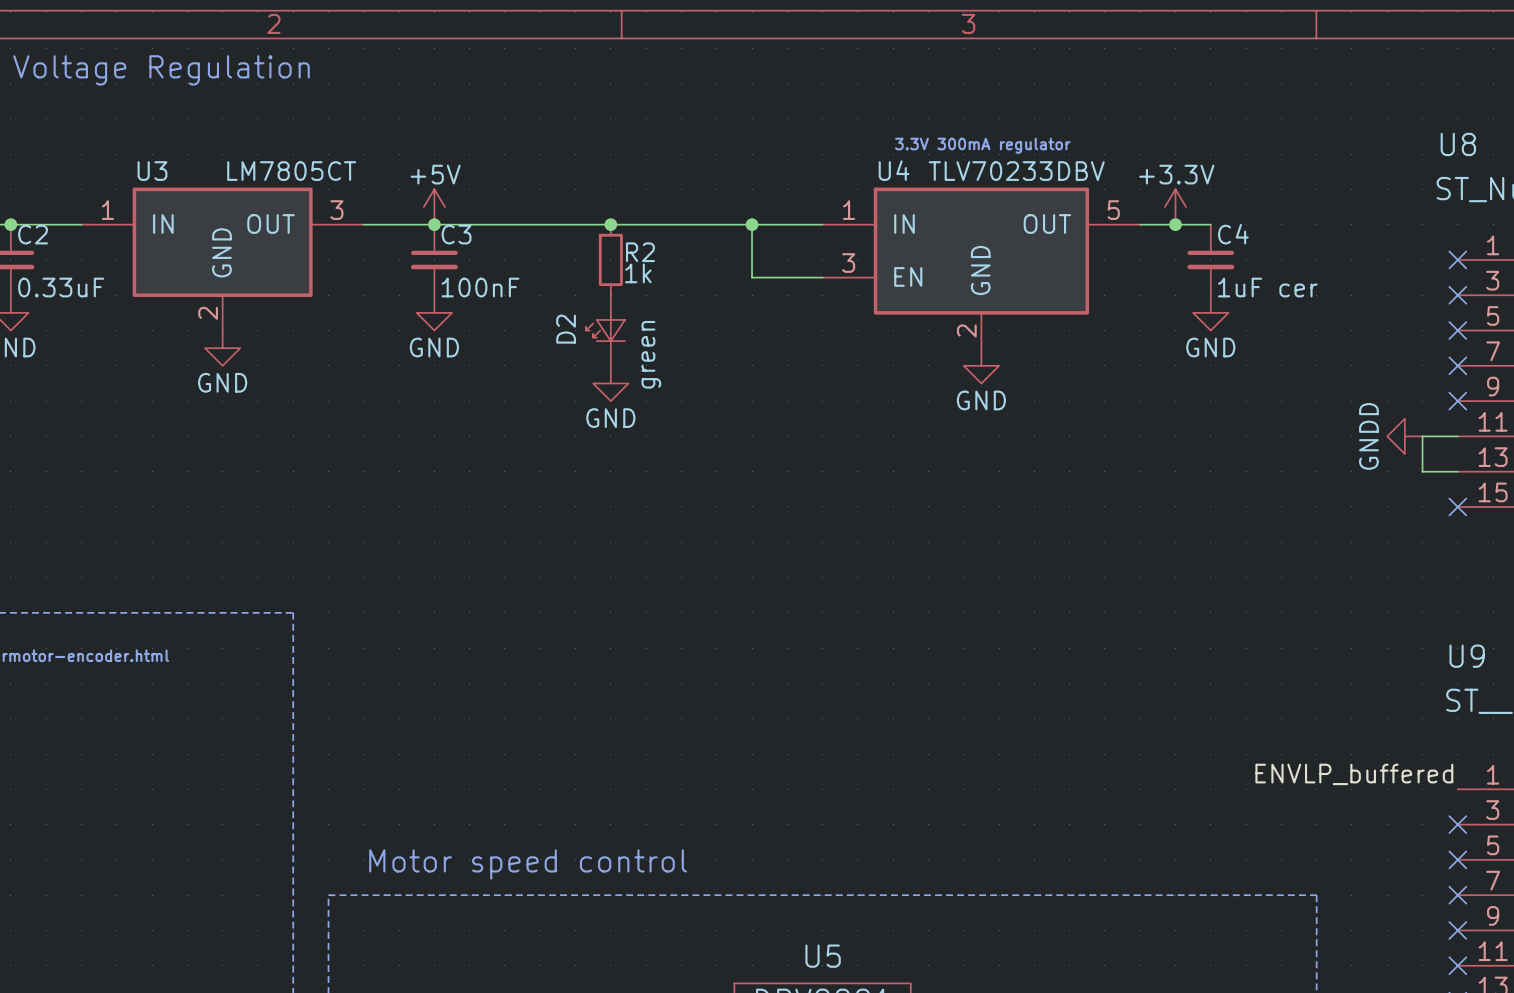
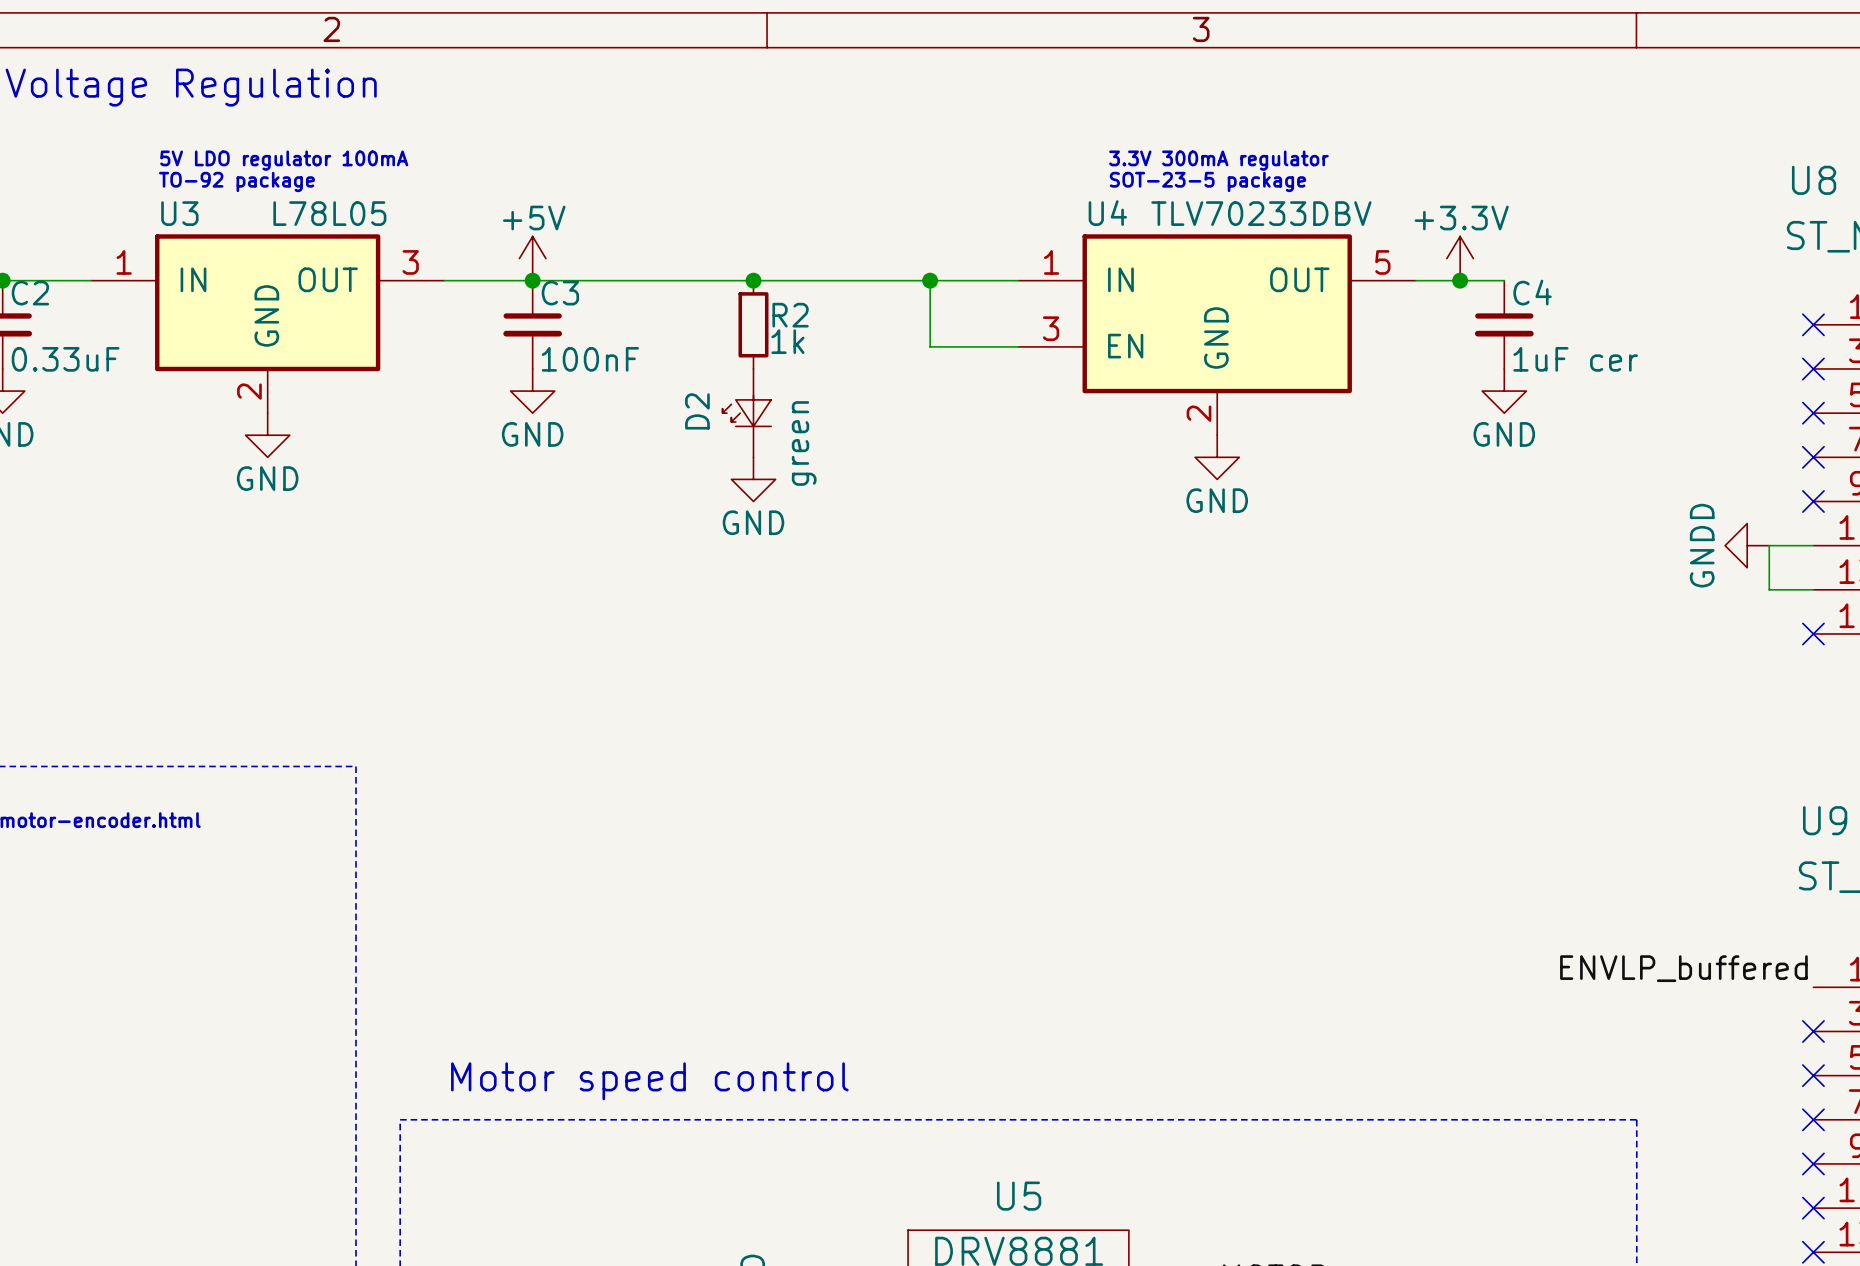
text: none -> 5V LDO regulator 100mA (284, 160)
text: none -> 3.3V 300mA regulator (1218, 160)
text: none -> TO-92 package (236, 181)
text: 3.3V 300mA regulator (982, 145) -> SOT-23-5 package (1207, 181)
U3 value: LM7805CT (291, 171) -> L78L05 (329, 213)

